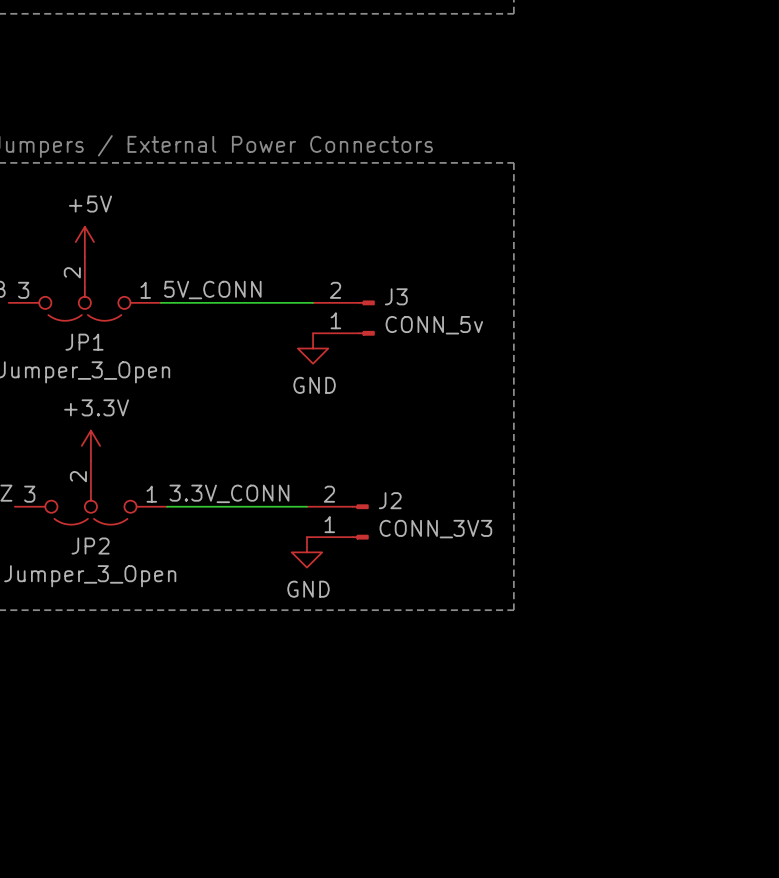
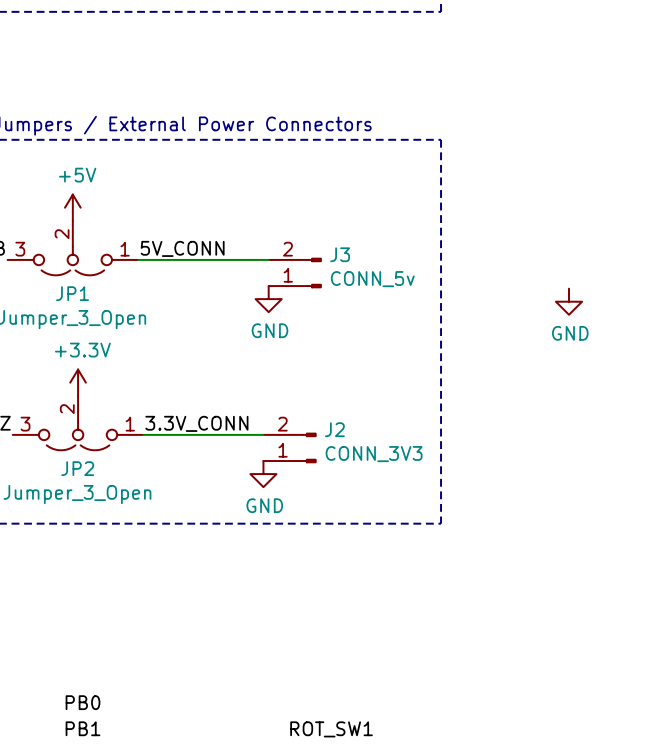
power symbol: none -> GND (568, 301)
label: none -> PB0 (83, 702)
label: none -> PB1 (83, 728)
label: none -> ROT_SW1 (331, 729)

